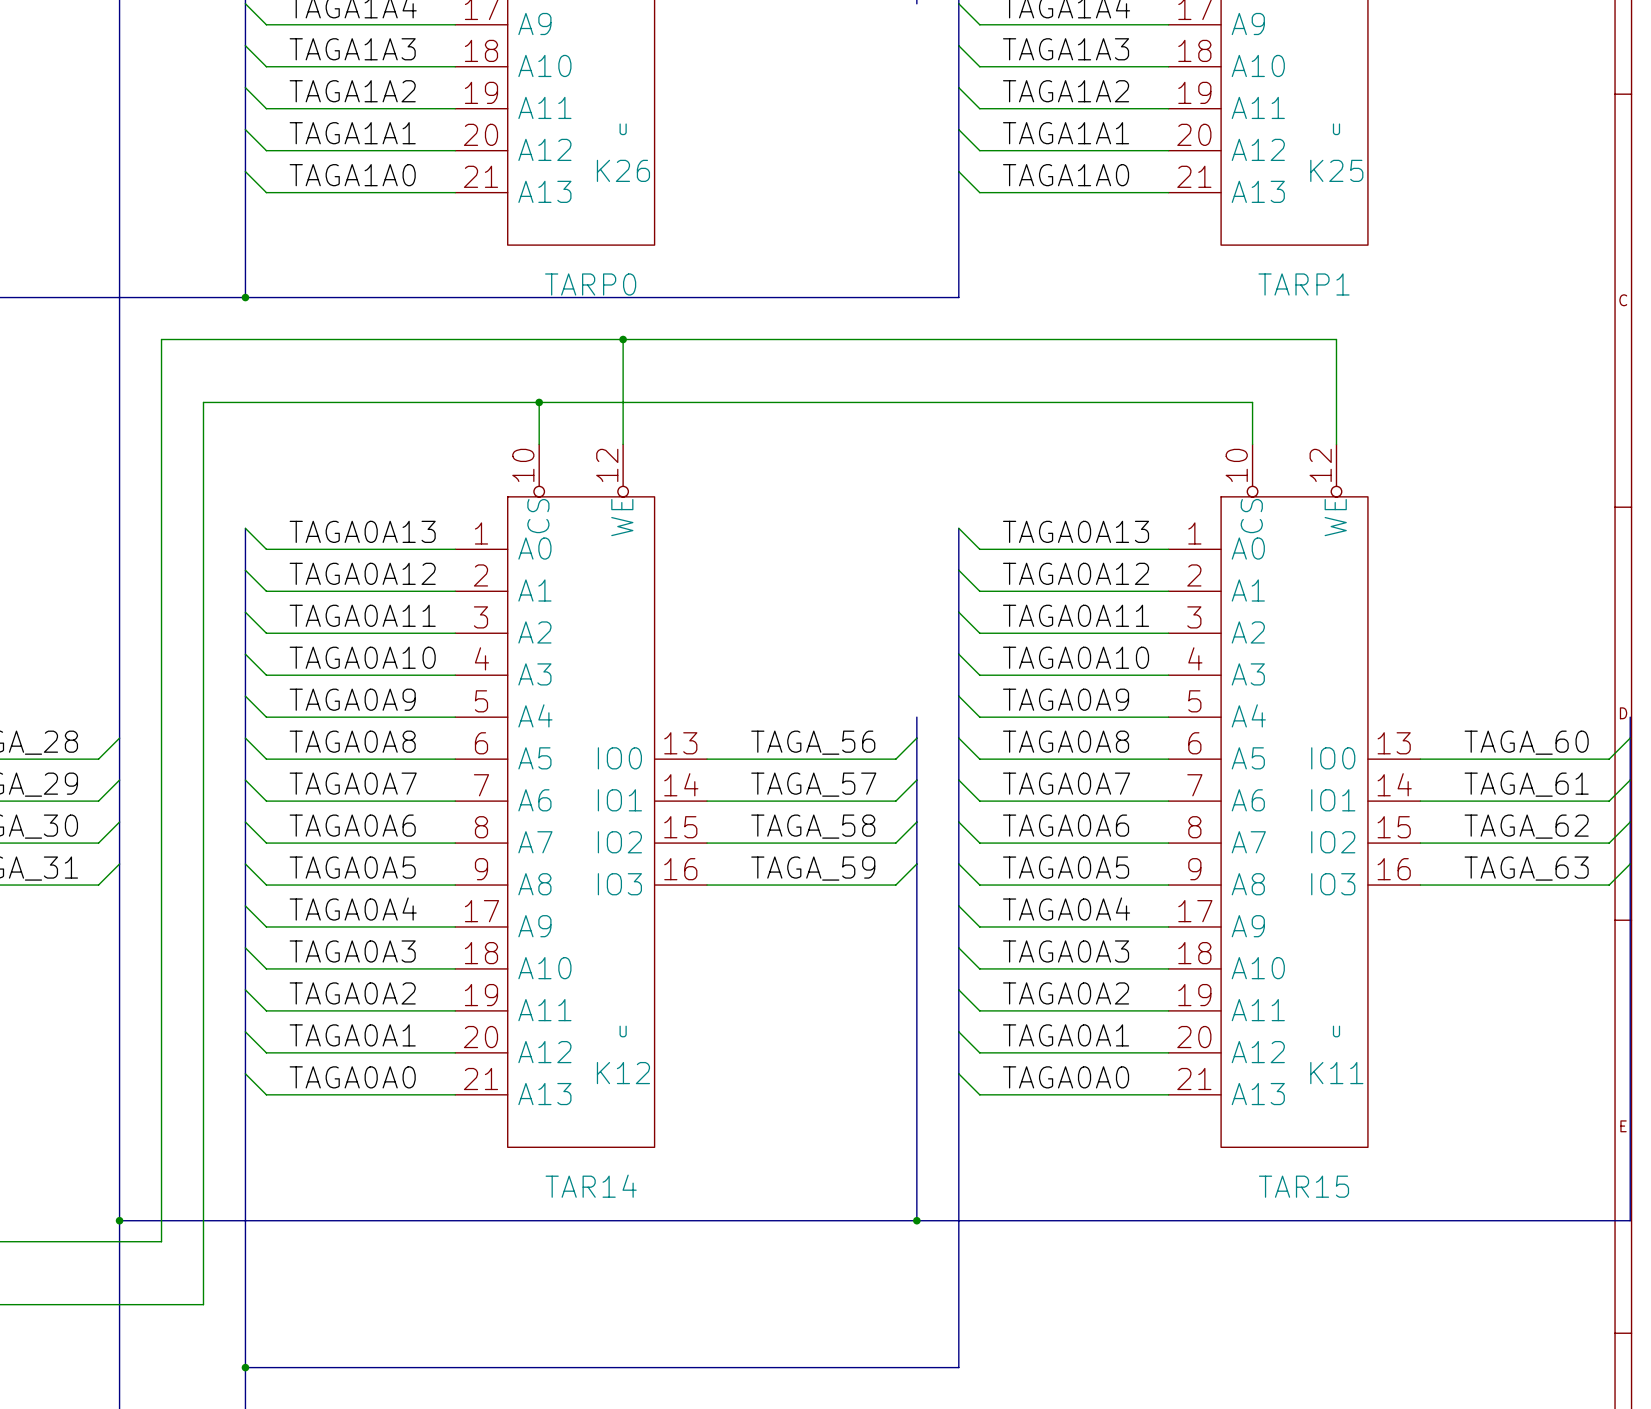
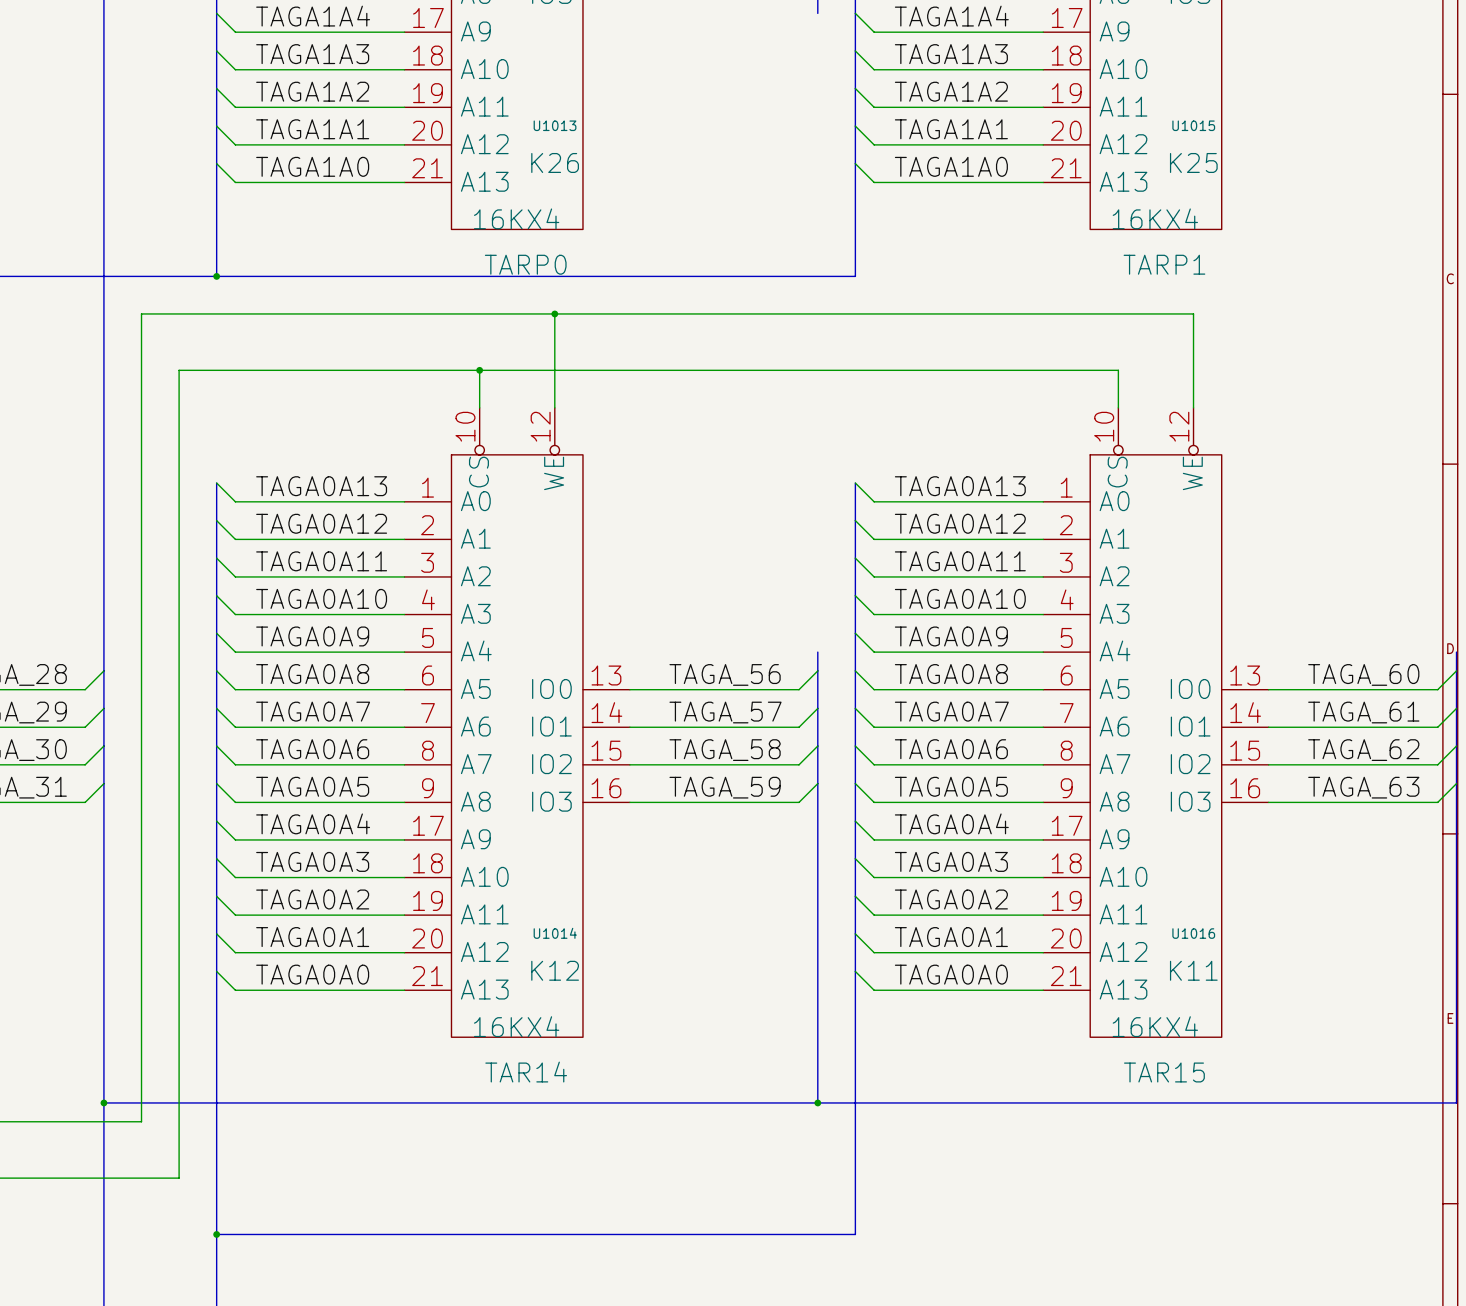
U name: U (623, 129) -> U1013 (555, 125)
U name: U (1336, 129) -> U1015 (1193, 125)
U value: none -> 16KX4 (516, 218)
U value: none -> 16KX4 (1155, 218)
U name: U (623, 1031) -> U1014 (555, 933)
U name: U (1336, 1031) -> U1016 (1193, 933)
U value: none -> 16KX4 (516, 1026)
U value: none -> 16KX4 (1155, 1026)

